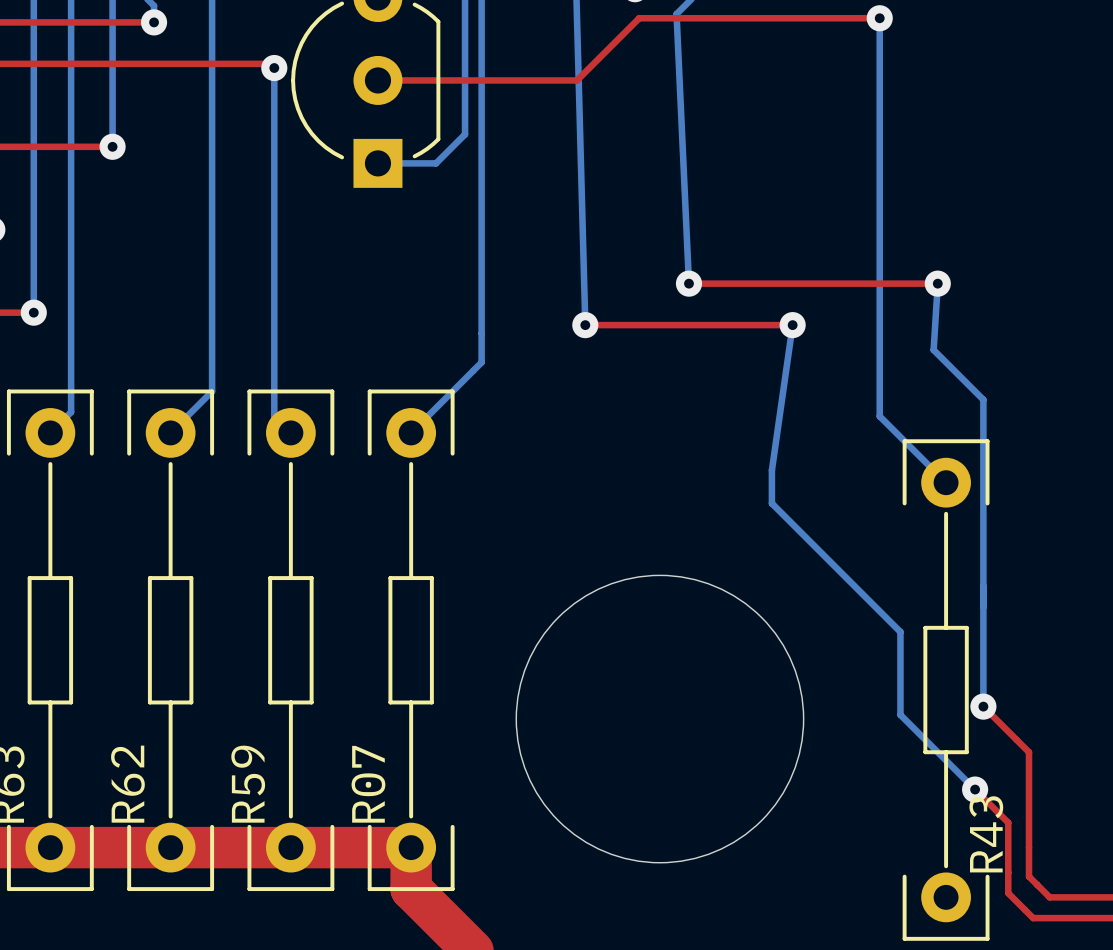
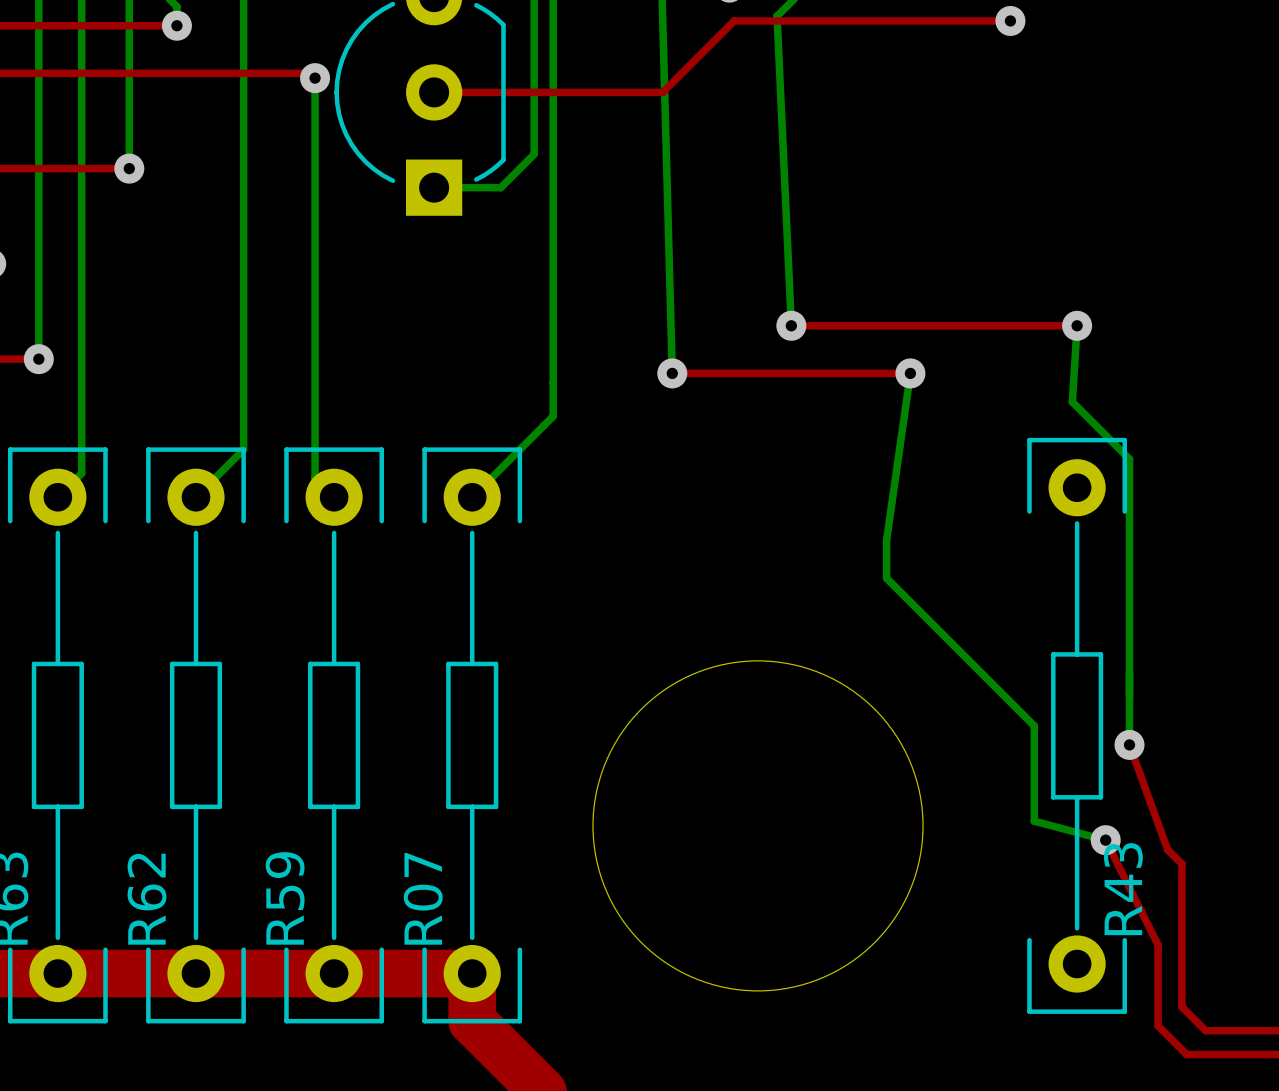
bottom track: (879, 18) (879, 416) (946, 482) -> none
bottom track: (983, 648) (983, 706) -> none
via: none -> (1129, 744)
R43 position: (946, 690) -> (1077, 725)
top track: (983, 706) (1016, 739) -> (1129, 744) (1167, 849)
via position: (983, 706) -> (1105, 840)
bottom track: (900, 714) (975, 789) -> (1034, 821) (1105, 840)
top track: (975, 789) (1008, 822) -> (1105, 840) (1158, 944)
via: (975, 789) -> none

